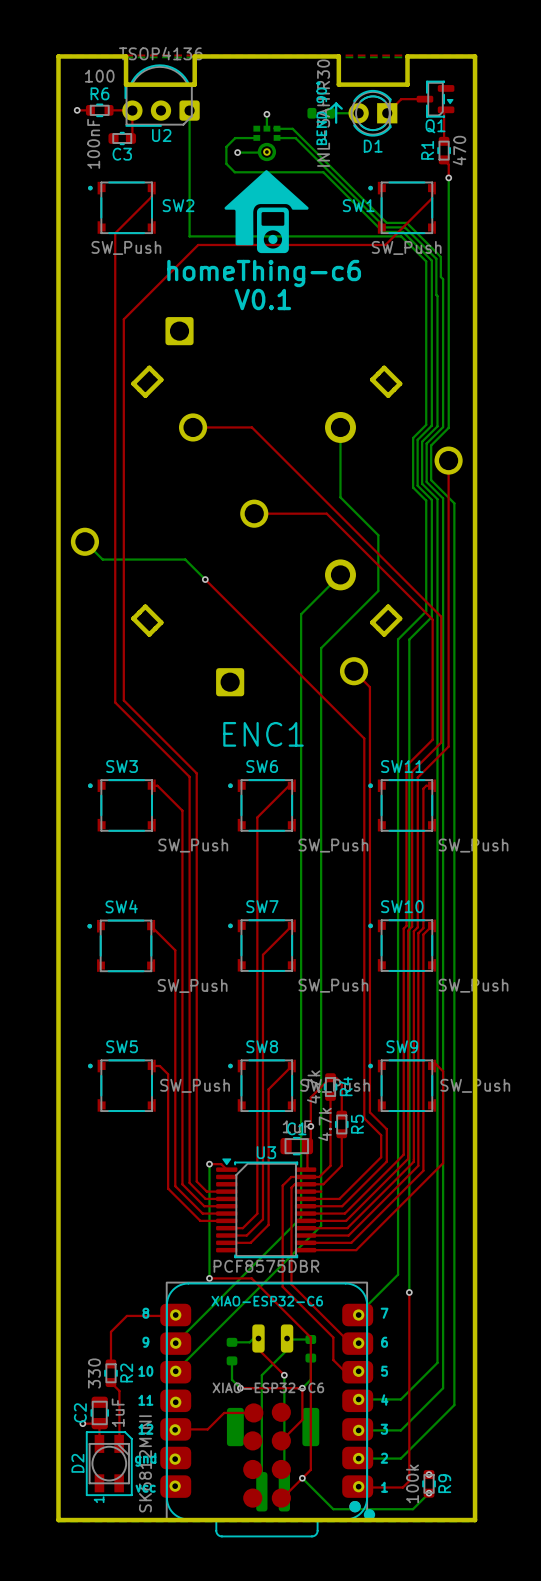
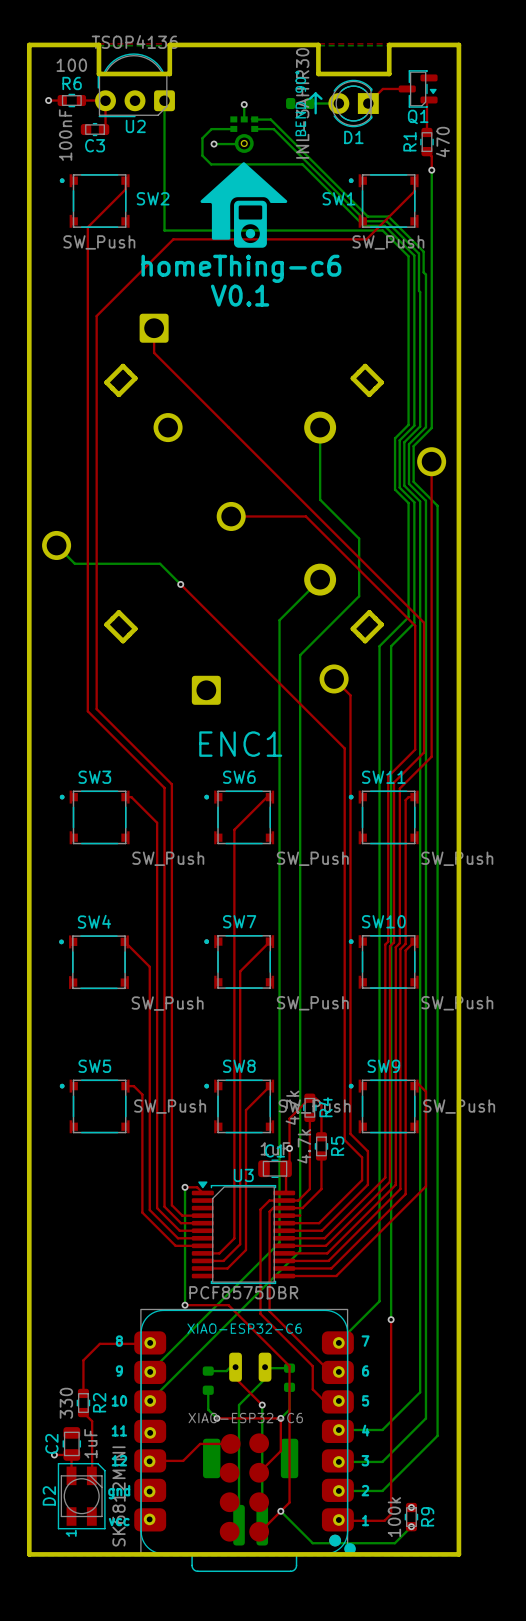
top track: (193, 427) (251, 427) -> (154, 328) (154, 352) (228, 427)

